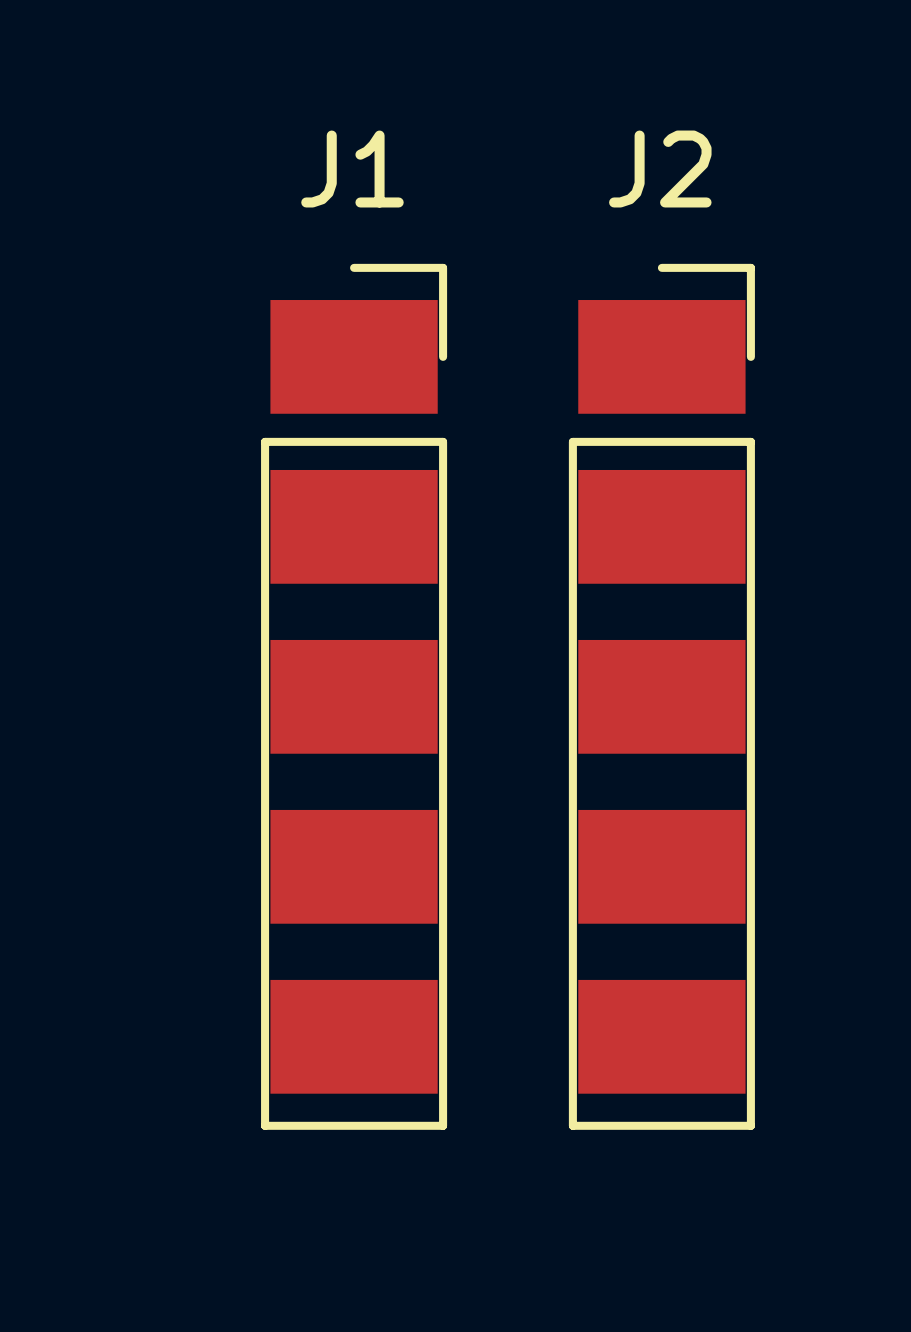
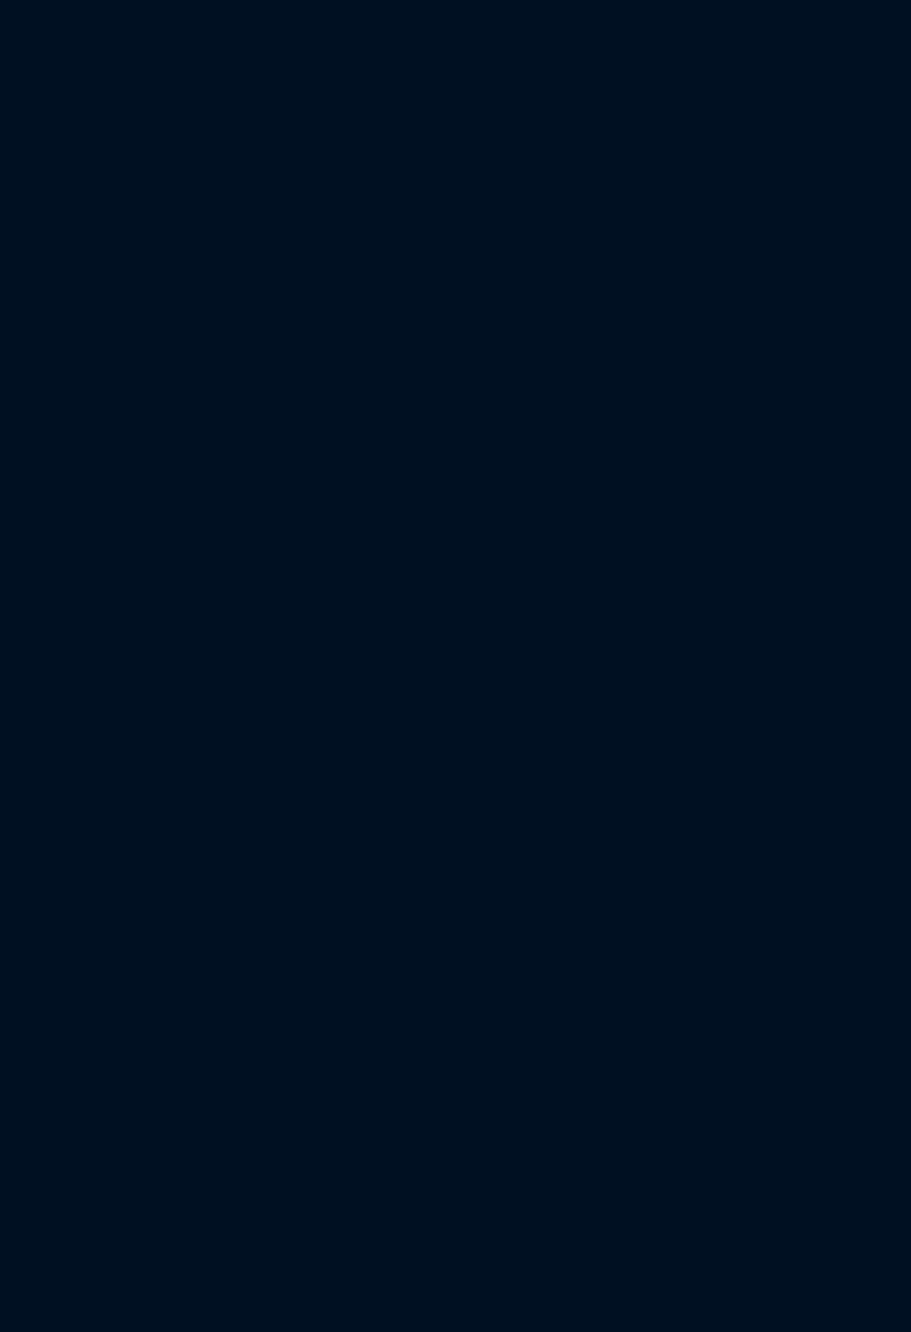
J1: (354, 696) -> none
J2: (661, 696) -> none

